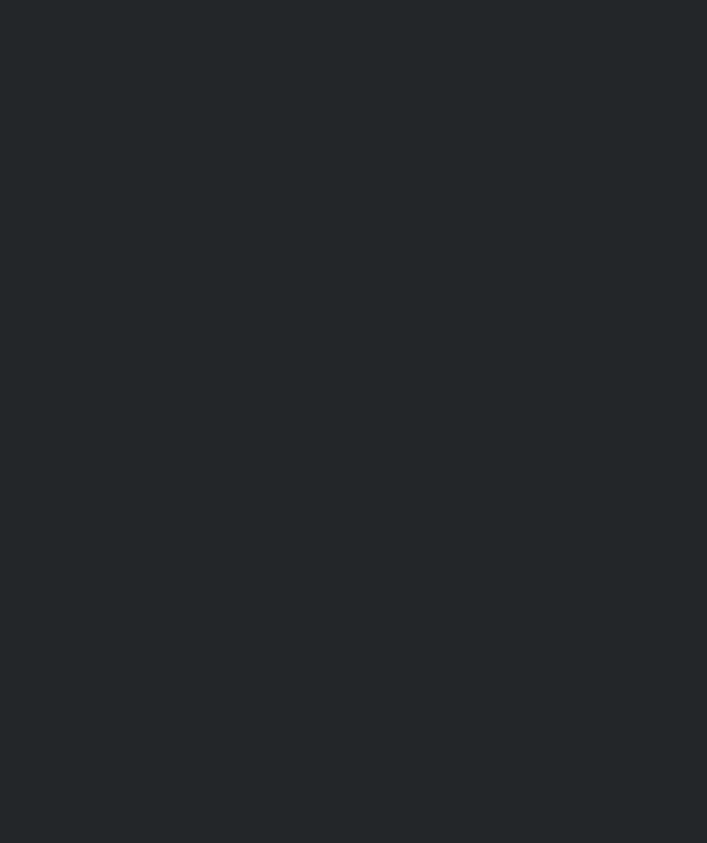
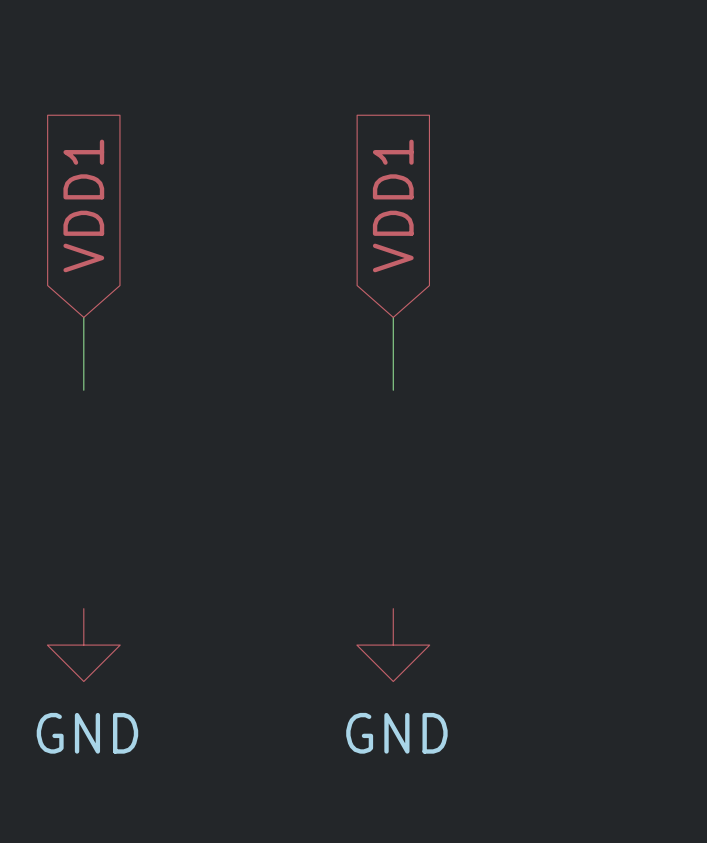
global label: none -> VDD1 (83, 205)
global label: none -> VDD1 (393, 205)
wire: none -> (83, 317) (83, 390)
wire: none -> (393, 317) (393, 390)
power symbol: none -> GND (83, 645)
power symbol: none -> GND (393, 645)

